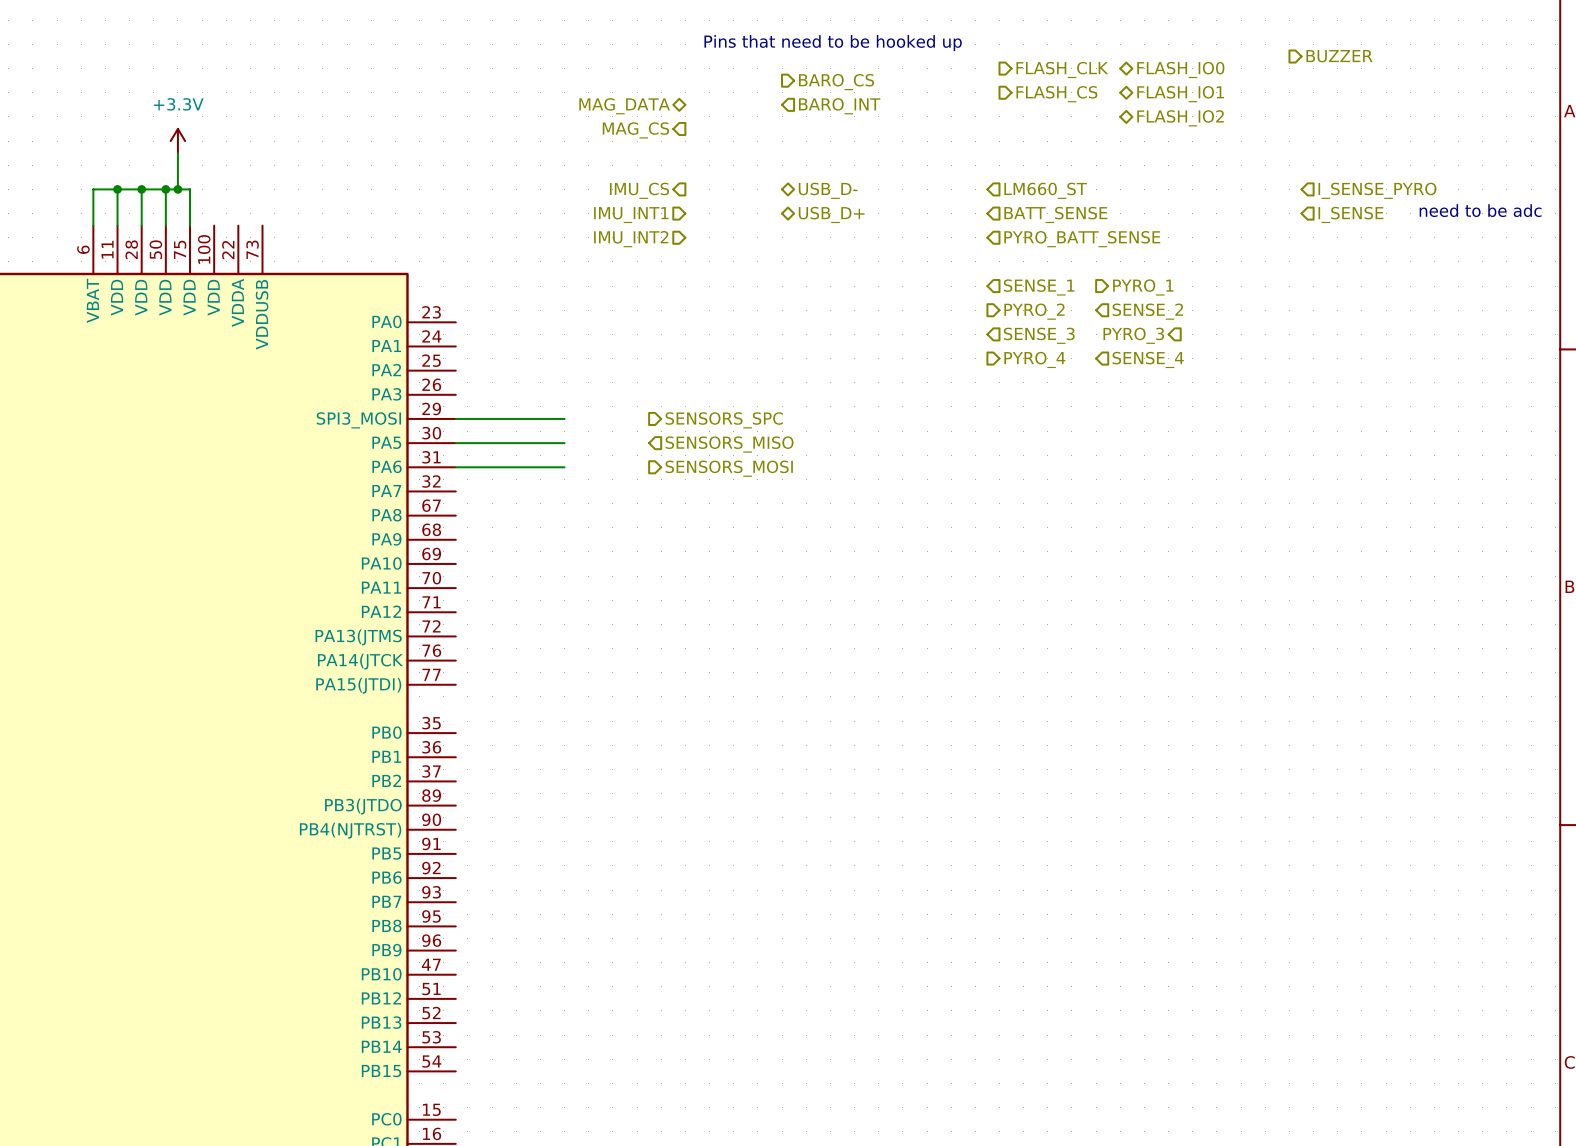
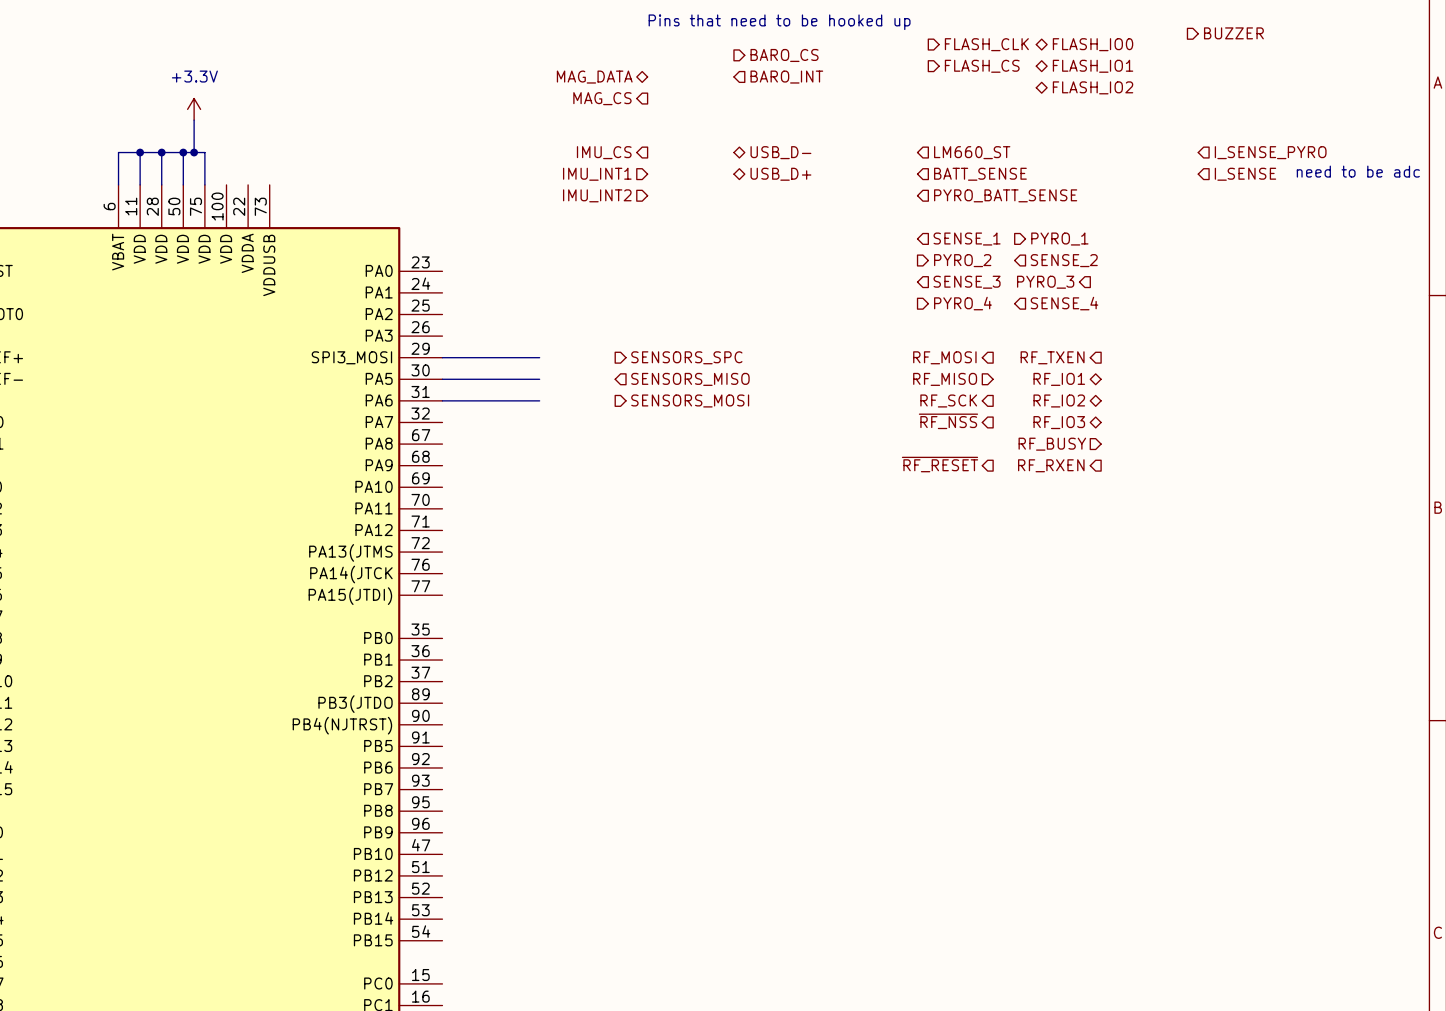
hierarchical label: none -> RF_MOSI (944, 357)
hierarchical label: none -> RF_TXEN (1052, 357)
hierarchical label: none -> RF_MISO (945, 379)
hierarchical label: none -> RF_IO1 (1059, 379)
hierarchical label: none -> RF_SCK (948, 400)
hierarchical label: none -> RF_IO2 (1059, 400)
hierarchical label: none -> ~{RF_NSS} (948, 421)
hierarchical label: none -> RF_IO3 (1059, 422)
hierarchical label: none -> RF_BUSY (1052, 444)
hierarchical label: none -> ~{RF_RESET} (940, 464)
hierarchical label: none -> RF_RXEN (1051, 465)

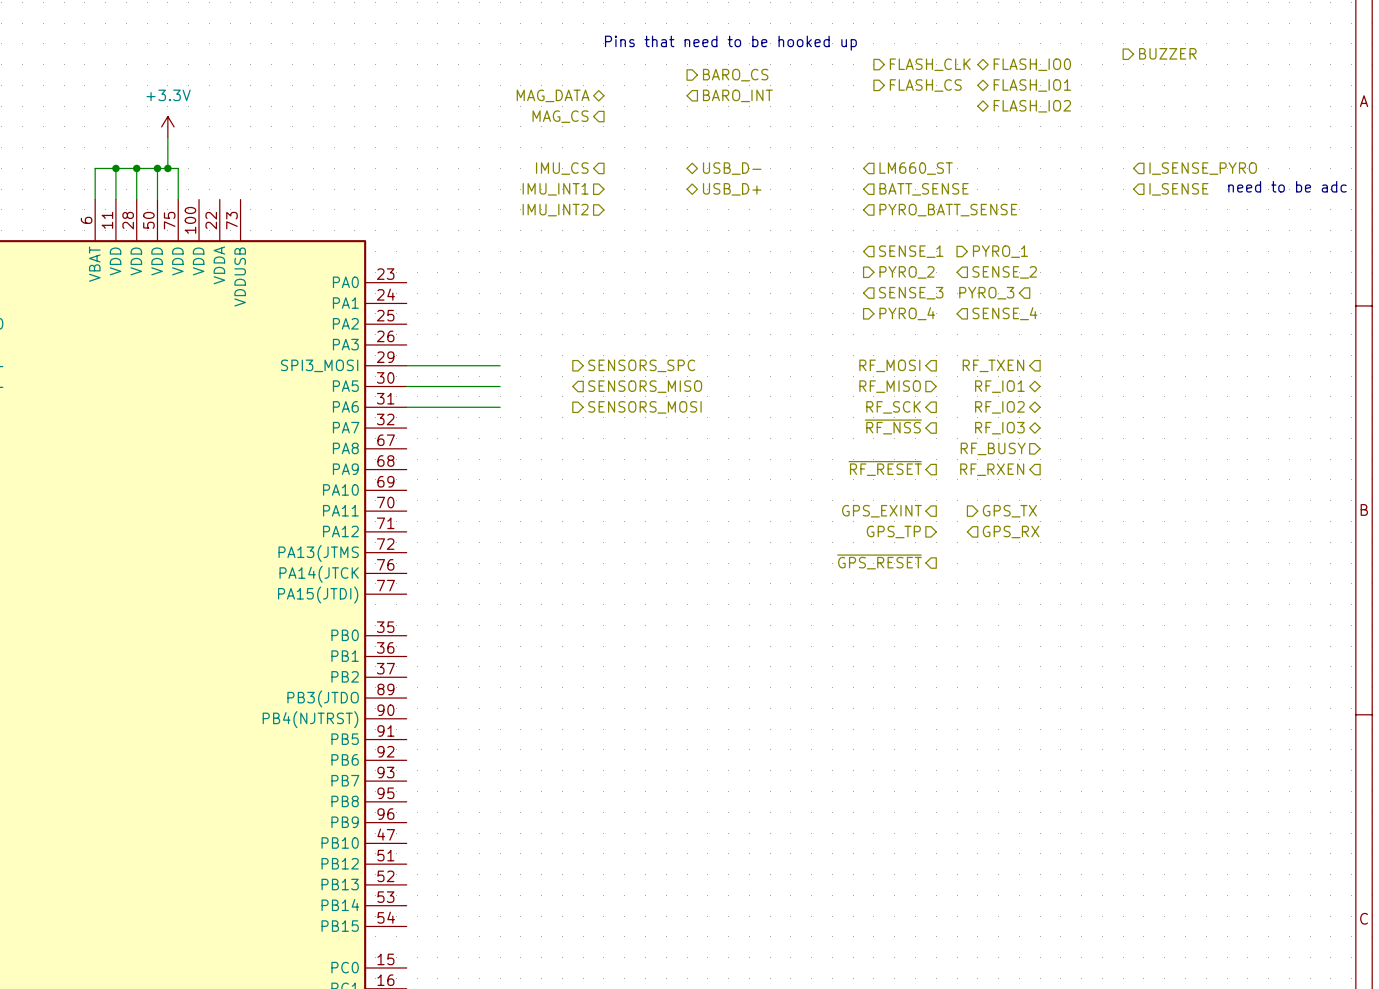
hierarchical label: none -> GPS_EXINT (881, 511)
hierarchical label: none -> GPS_TX (1009, 511)
hierarchical label: none -> GPS_TP (893, 531)
hierarchical label: none -> GPS_RX (1011, 531)
hierarchical label: none -> ~{GPS_RESET} (879, 561)

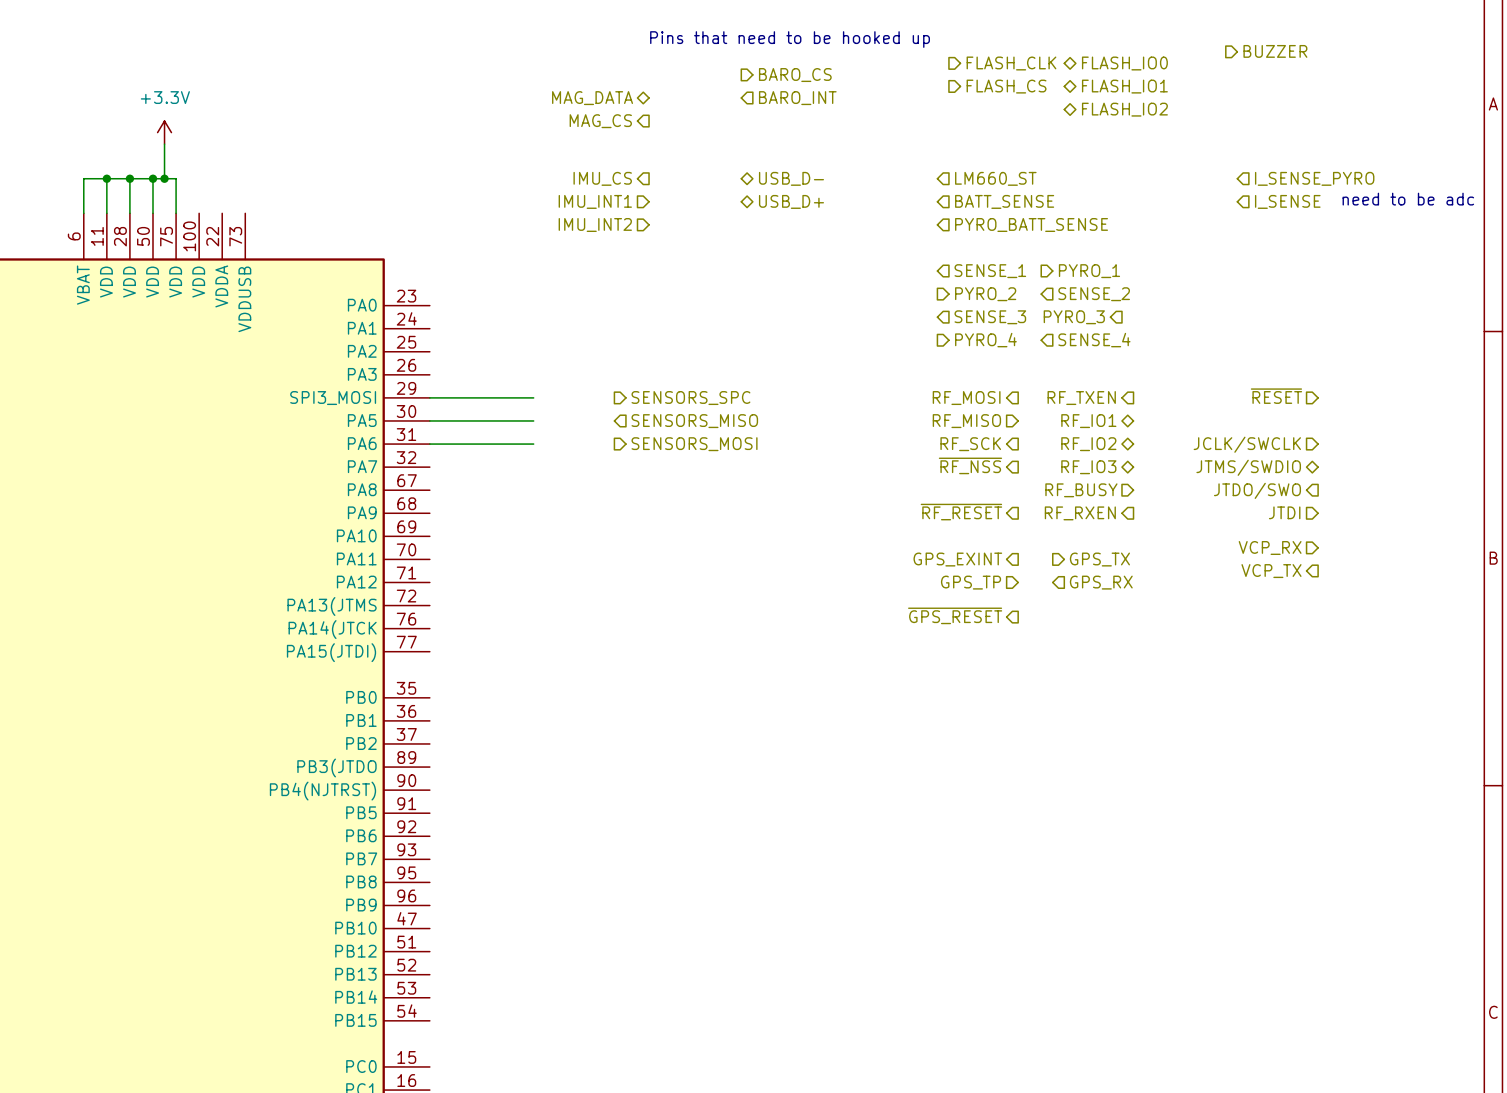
hierarchical label: none -> ~{RESET} (1276, 396)
hierarchical label: none -> JCLK/SWCLK (1247, 444)
hierarchical label: none -> JTMS/SWDIO (1248, 467)
hierarchical label: none -> JTDO/SWO (1257, 490)
hierarchical label: none -> JTDI (1284, 512)
hierarchical label: none -> VCP_RX (1270, 547)
hierarchical label: none -> VCP_TX (1271, 571)

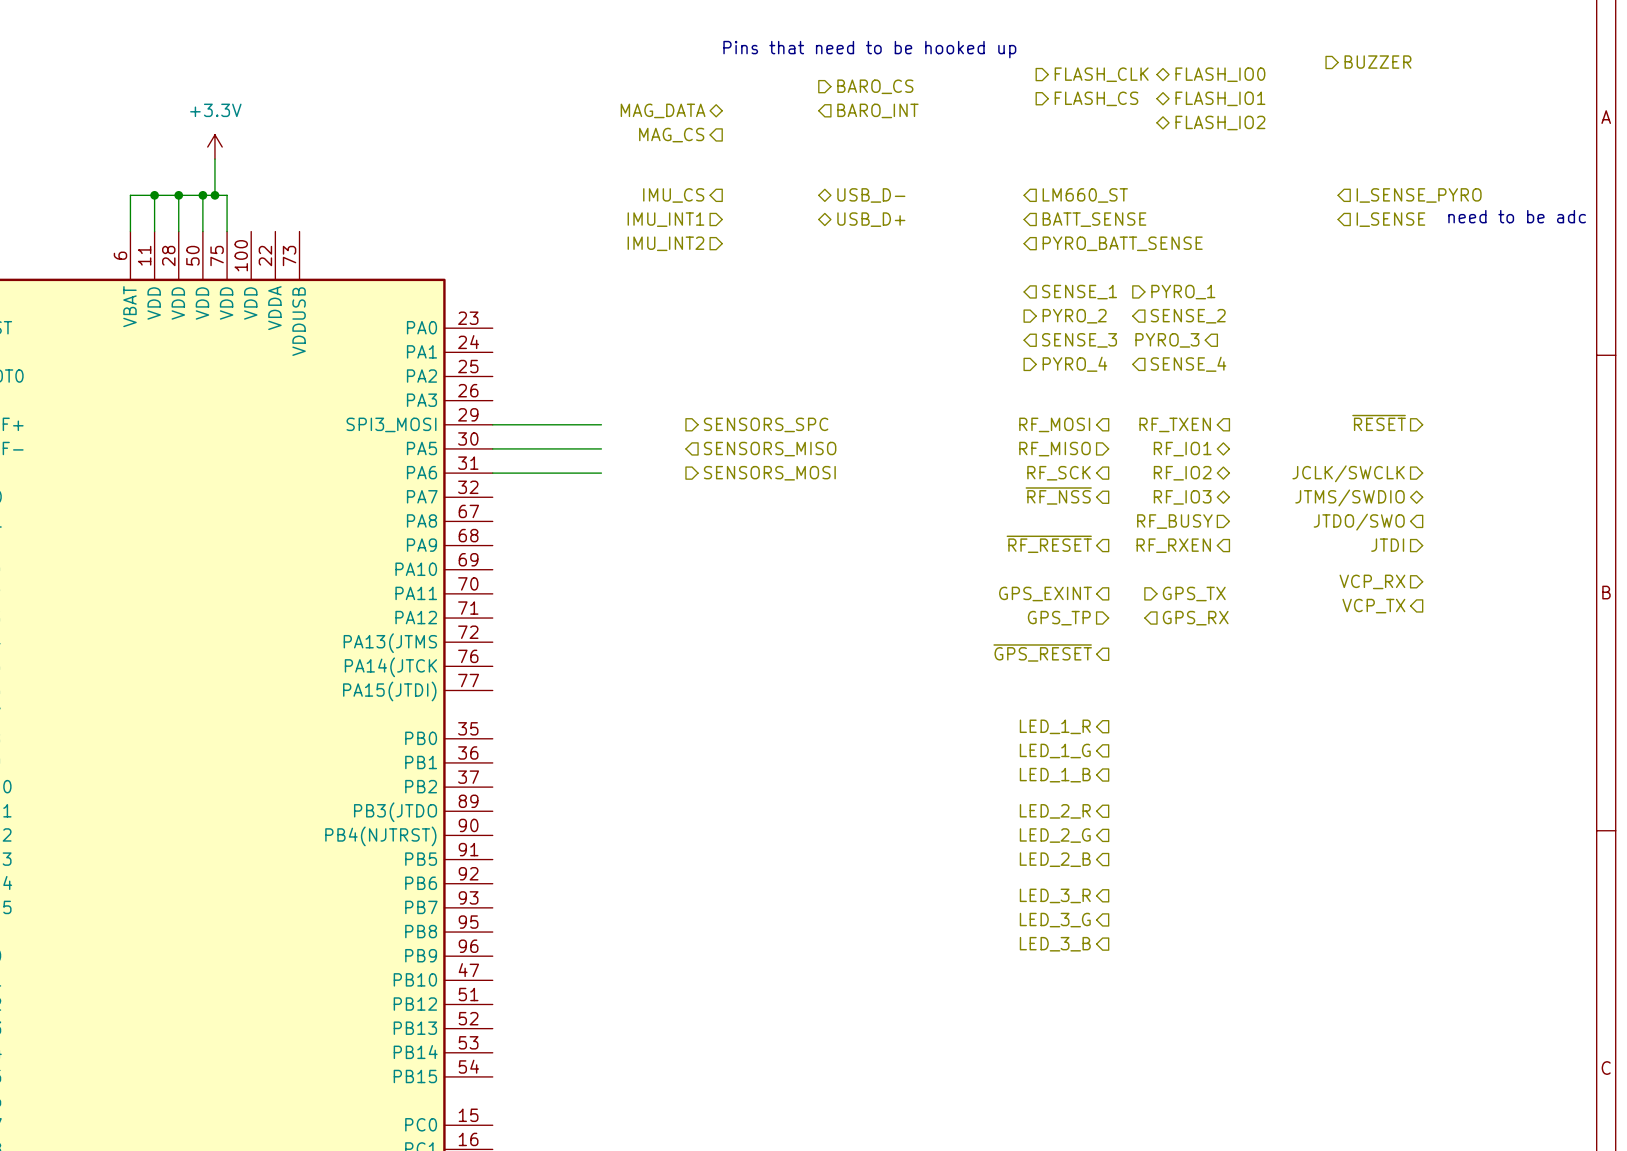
hierarchical label: none -> LED_1_R (1055, 726)
hierarchical label: none -> LED_1_G (1055, 750)
hierarchical label: none -> LED_1_B (1055, 775)
hierarchical label: none -> LED_2_R (1055, 811)
hierarchical label: none -> LED_2_G (1055, 835)
hierarchical label: none -> LED_2_B (1055, 859)
hierarchical label: none -> LED_3_R (1055, 895)
hierarchical label: none -> LED_3_G (1055, 920)
hierarchical label: none -> LED_3_B (1055, 944)

